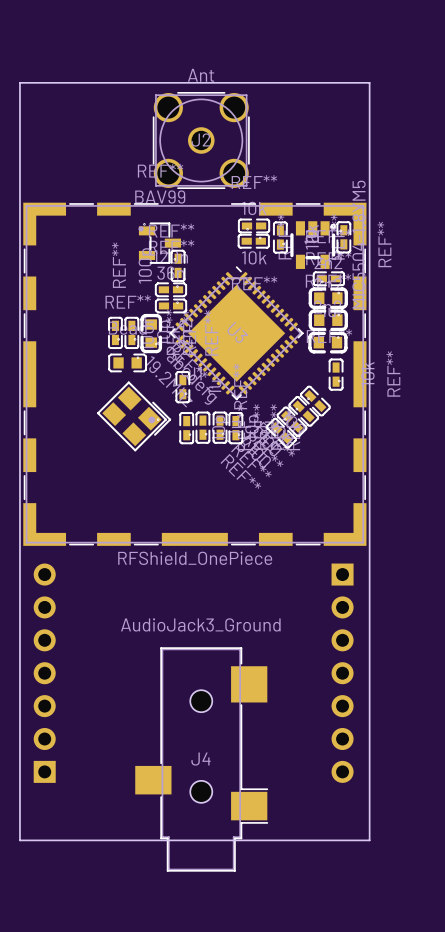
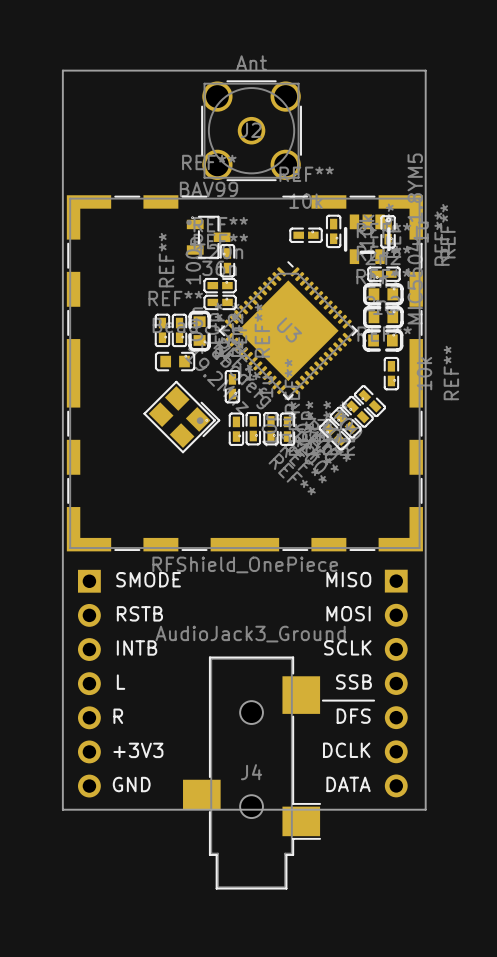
board edge: (19, 82) (369, 82) (369, 840) (19, 840) (19, 82) -> (62, 70) (62, 809) (425, 809) (425, 70) (62, 70)
part: 10k (254, 225) -> none
part rotation: 0° (343, 237) -> 180° (388, 231)
part footprint: [33, 563, 56, 783] -> [77, 569, 101, 798]
part: none -> (364, 683)
part: (342, 673) -> none

